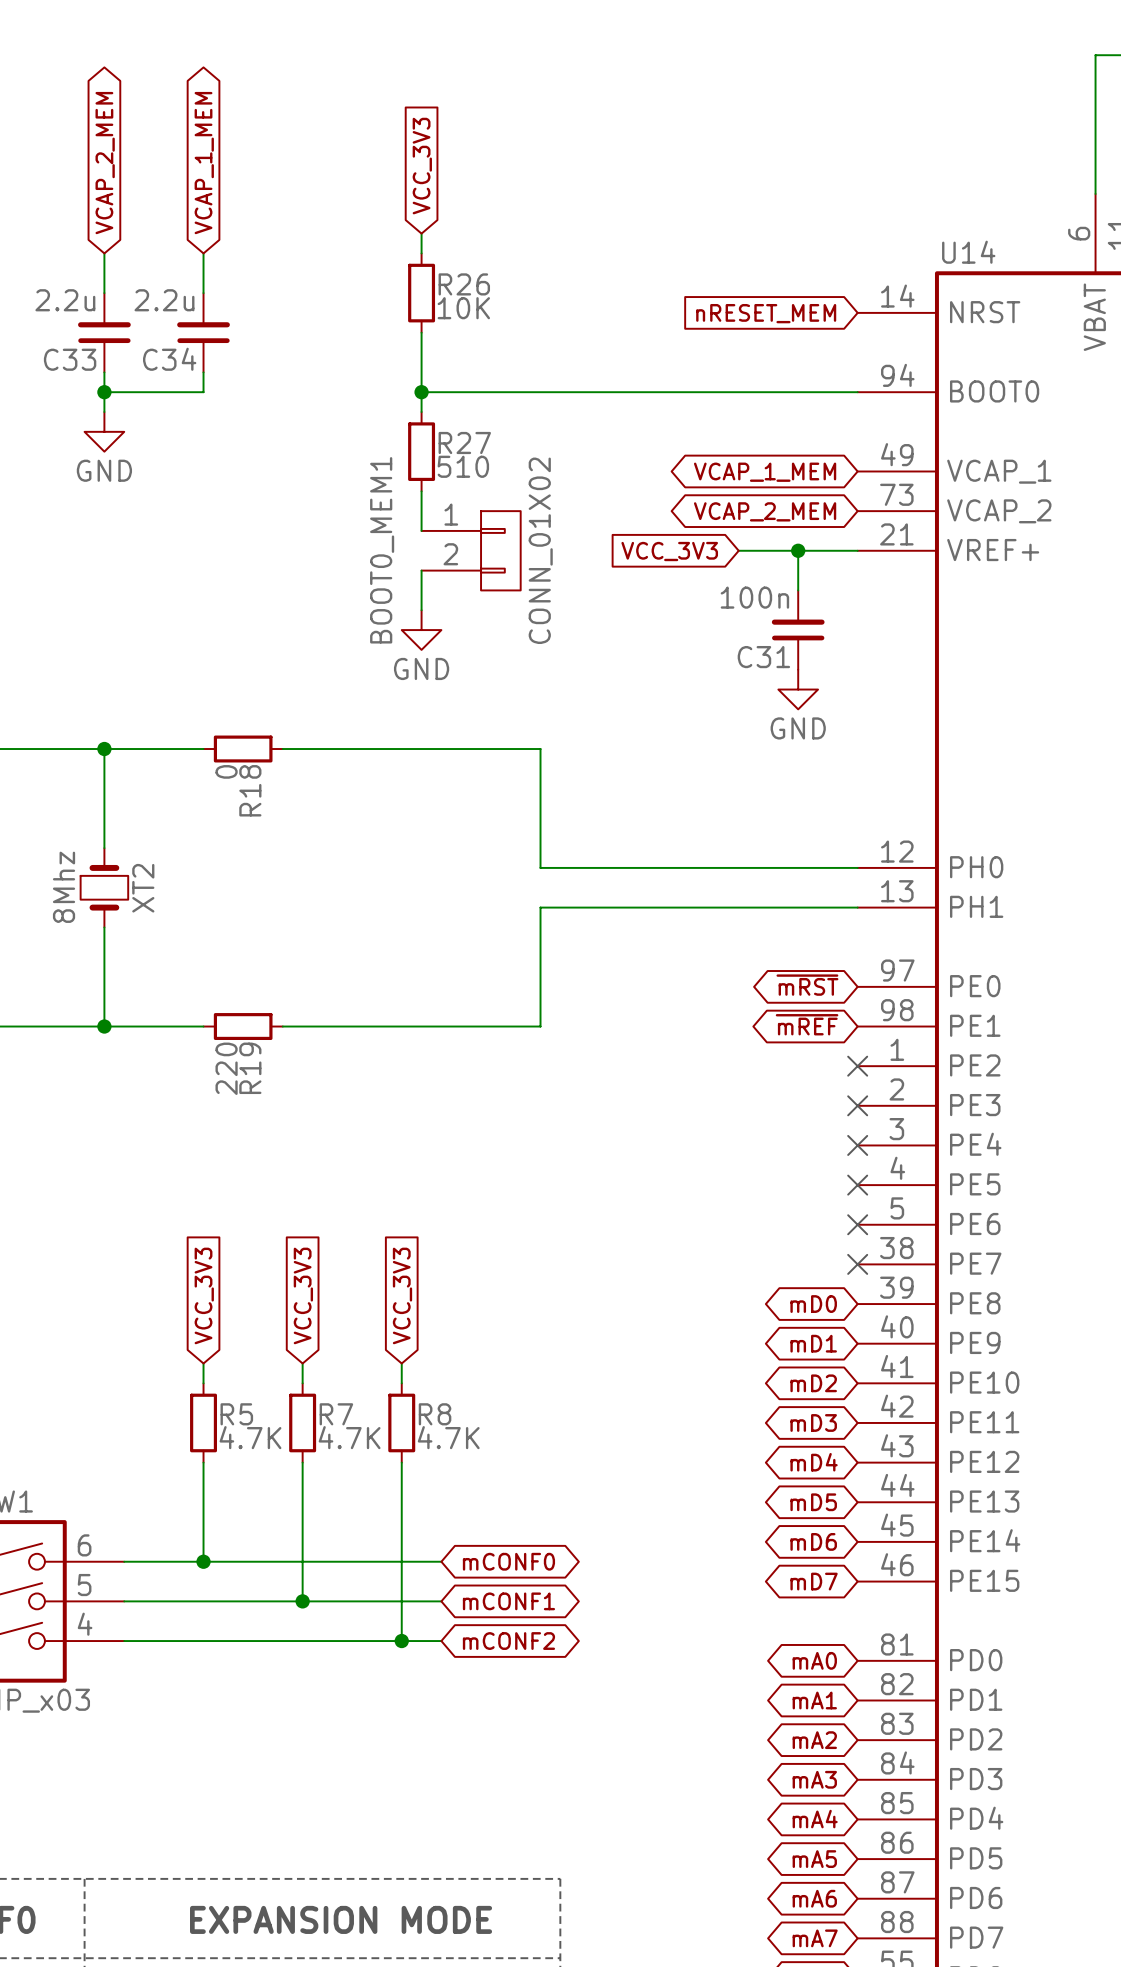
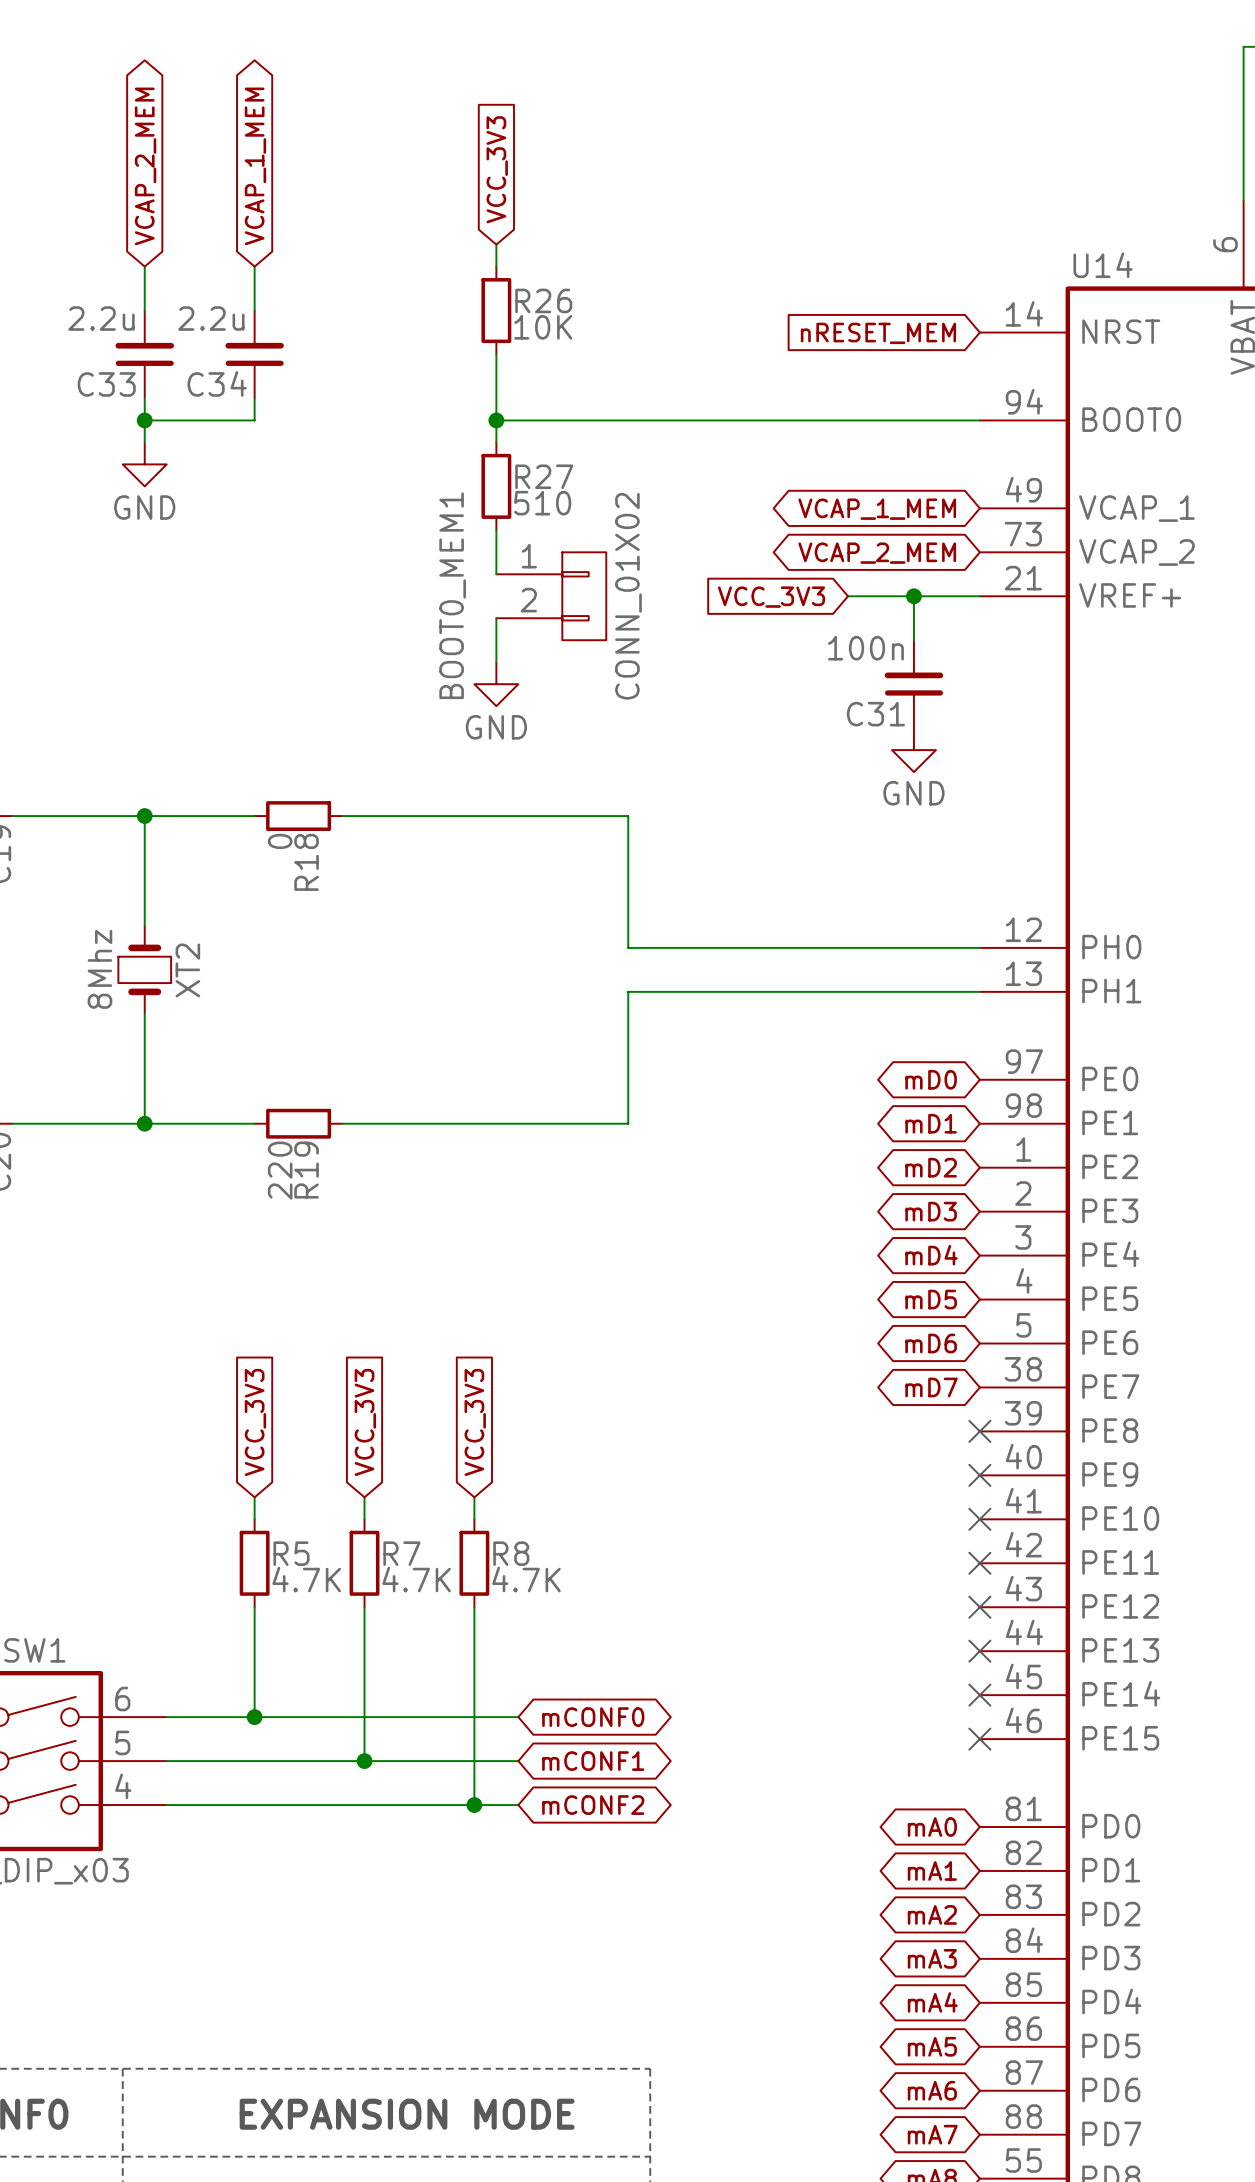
global label: ~{mRST} (807, 985) -> mD0 (931, 1079)
global label: ~{mREF} (807, 1024) -> mD1 (931, 1123)
no-connect mark: (857, 1066) -> none
no-connect mark: (857, 1105) -> none
no-connect mark: (857, 1145) -> none
no-connect mark: (857, 1185) -> none
no-connect mark: (857, 1224) -> none
no-connect mark: (857, 1264) -> none
global label: mD0 (813, 1304) -> none
no-connect mark: none -> (979, 1431)
global label: mD1 (813, 1343) -> none
no-connect mark: none -> (979, 1475)
global label position: mD2 (813, 1383) -> mD2 (931, 1167)
no-connect mark: none -> (979, 1519)
global label position: mD3 (813, 1422) -> mD3 (931, 1211)
no-connect mark: none -> (979, 1563)
global label position: mD4 (814, 1462) -> mD4 (931, 1255)
no-connect mark: none -> (979, 1607)
global label position: mD5 (813, 1502) -> mD5 (931, 1299)
no-connect mark: none -> (979, 1651)
global label position: mD6 (813, 1541) -> mD6 (931, 1343)
no-connect mark: none -> (979, 1695)
global label position: mD7 (814, 1581) -> mD7 (931, 1387)
no-connect mark: none -> (979, 1739)

